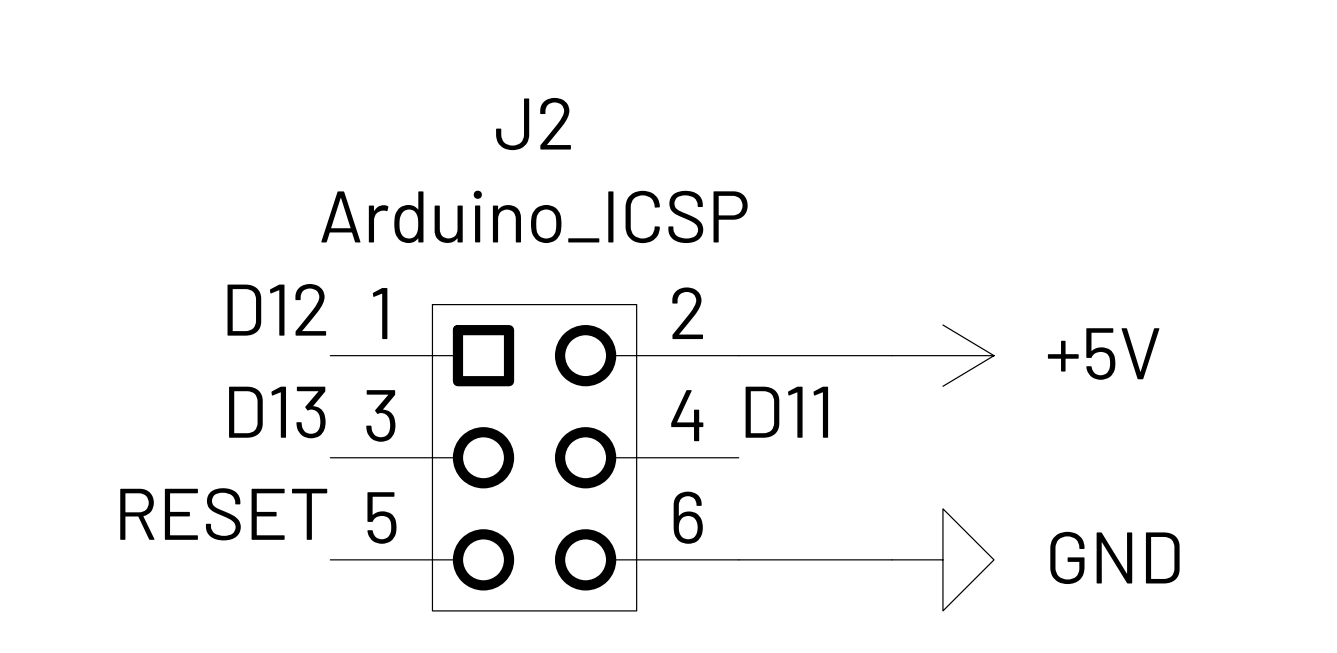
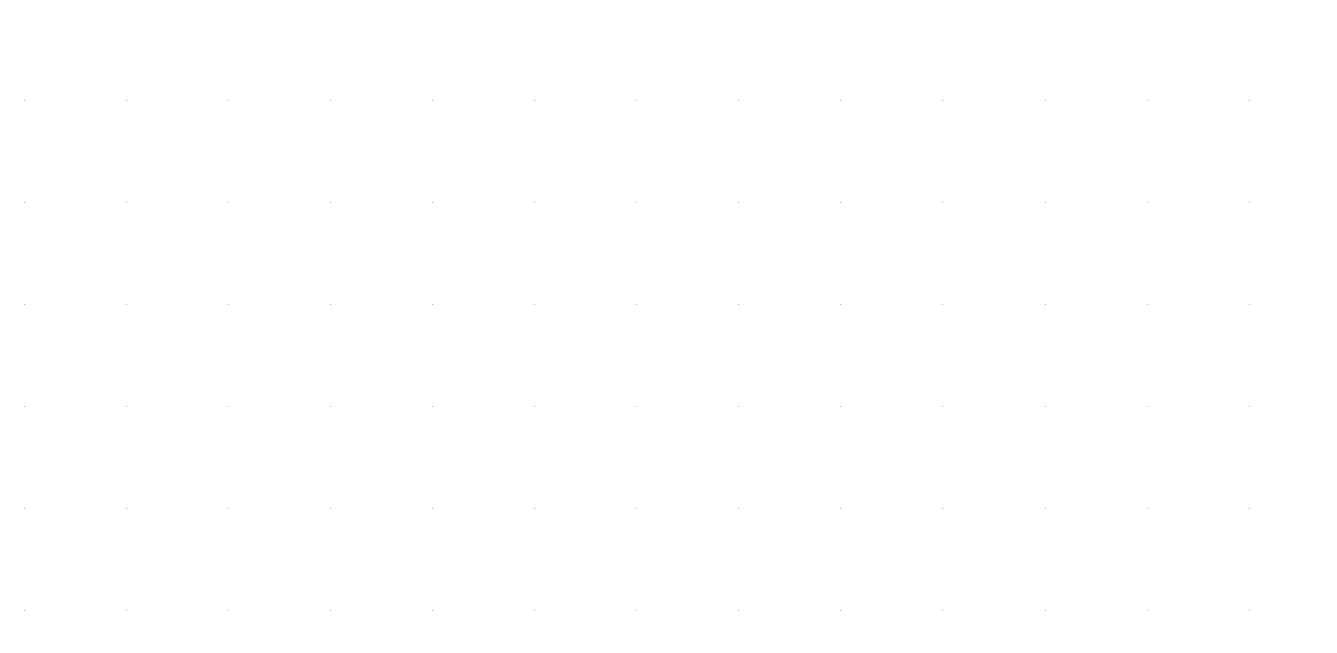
label: D12 (276, 309) -> none
wire: (738, 355) (891, 355) -> none
power symbol: +5V (942, 355) -> none
label: D13 (277, 412) -> none
label: D11 (786, 412) -> none
J2: Arduino_ICSP (534, 457) -> none
label: RESET (223, 514) -> none
wire: (738, 559) (891, 559) -> none
power symbol: GND (942, 559) -> none

